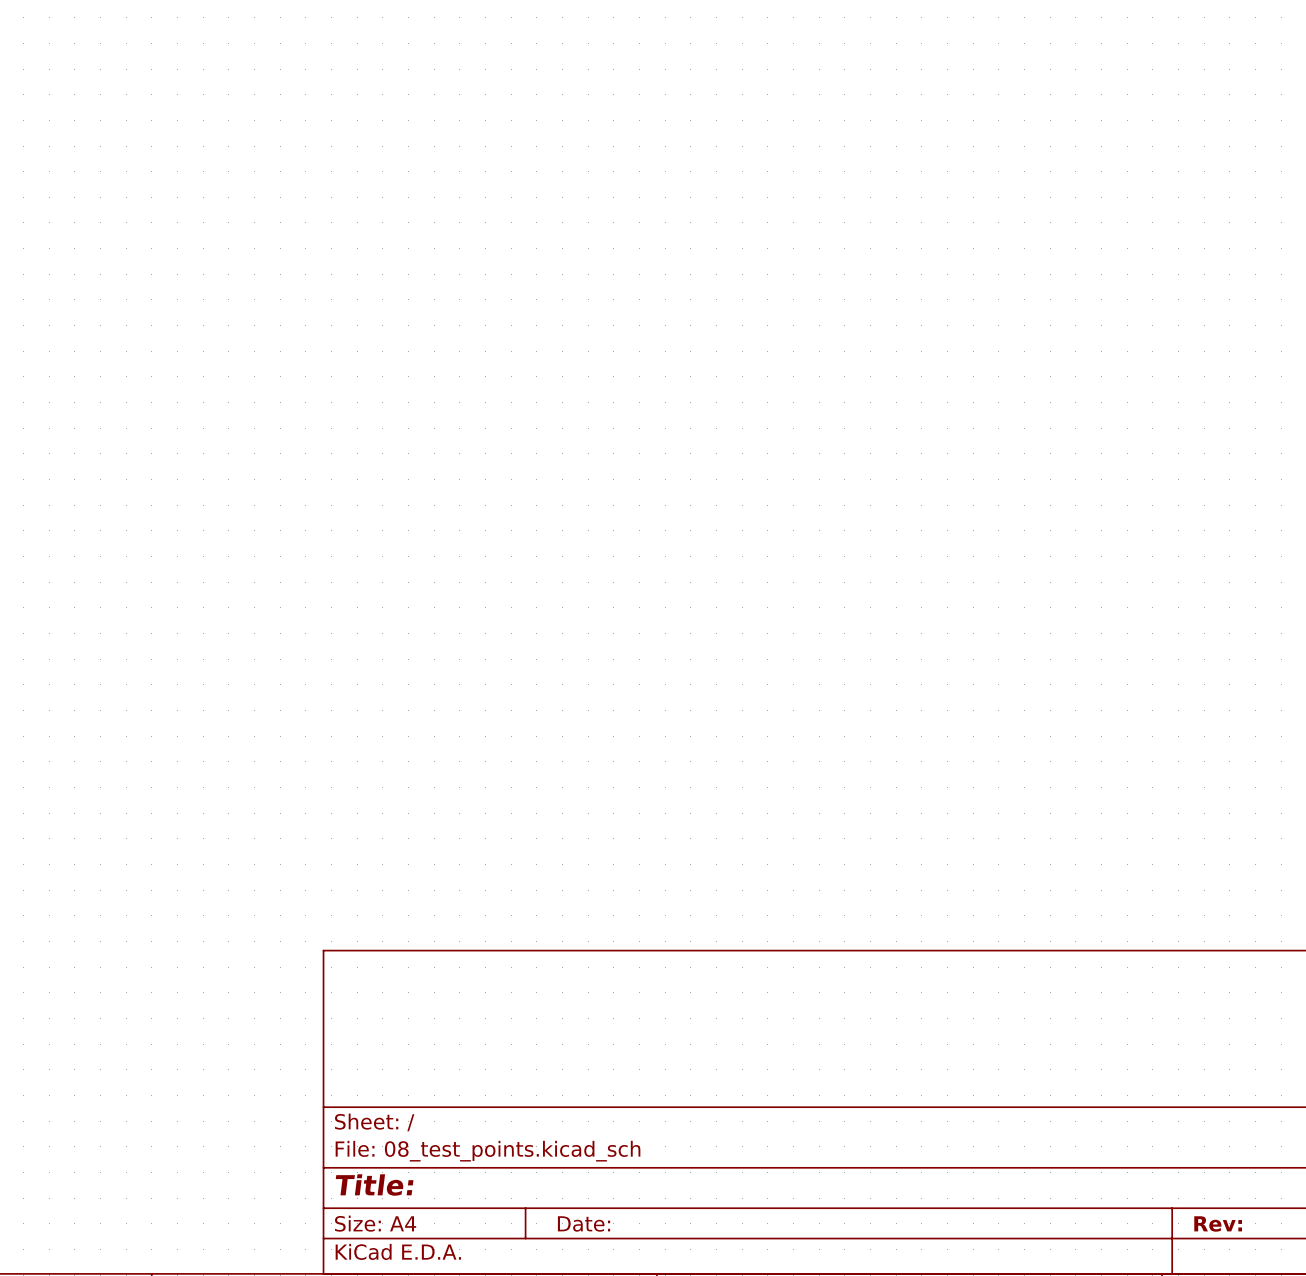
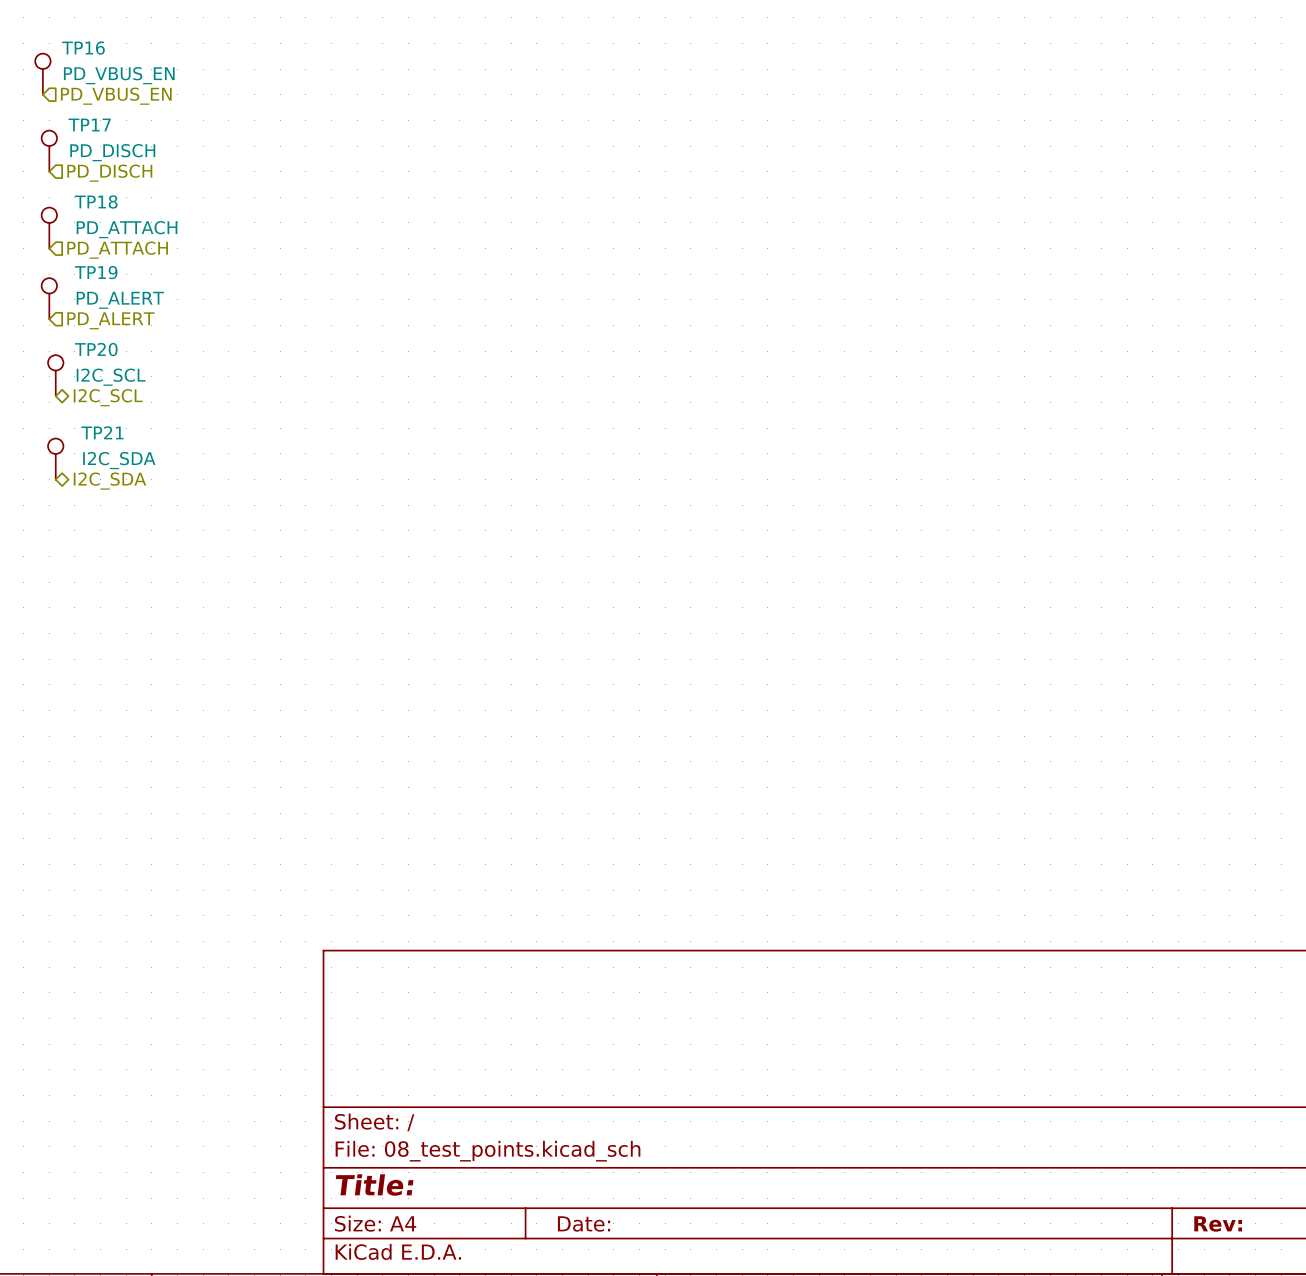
TP16: none -> PD_VBUS_EN (42, 74)
hierarchical label: none -> PD_VBUS_EN (116, 96)
TP17: none -> PD_DISCH (49, 151)
hierarchical label: none -> PD_DISCH (109, 173)
TP18: none -> PD_ATTACH (49, 228)
hierarchical label: none -> PD_ATTACH (117, 250)
TP19: none -> PD_ALERT (49, 298)
hierarchical label: none -> PD_ALERT (110, 320)
TP20: none -> I2C_SCL (55, 375)
hierarchical label: none -> I2C_SCL (108, 397)
TP21: none -> I2C_SDA (55, 459)
hierarchical label: none -> I2C_SDA (109, 481)

